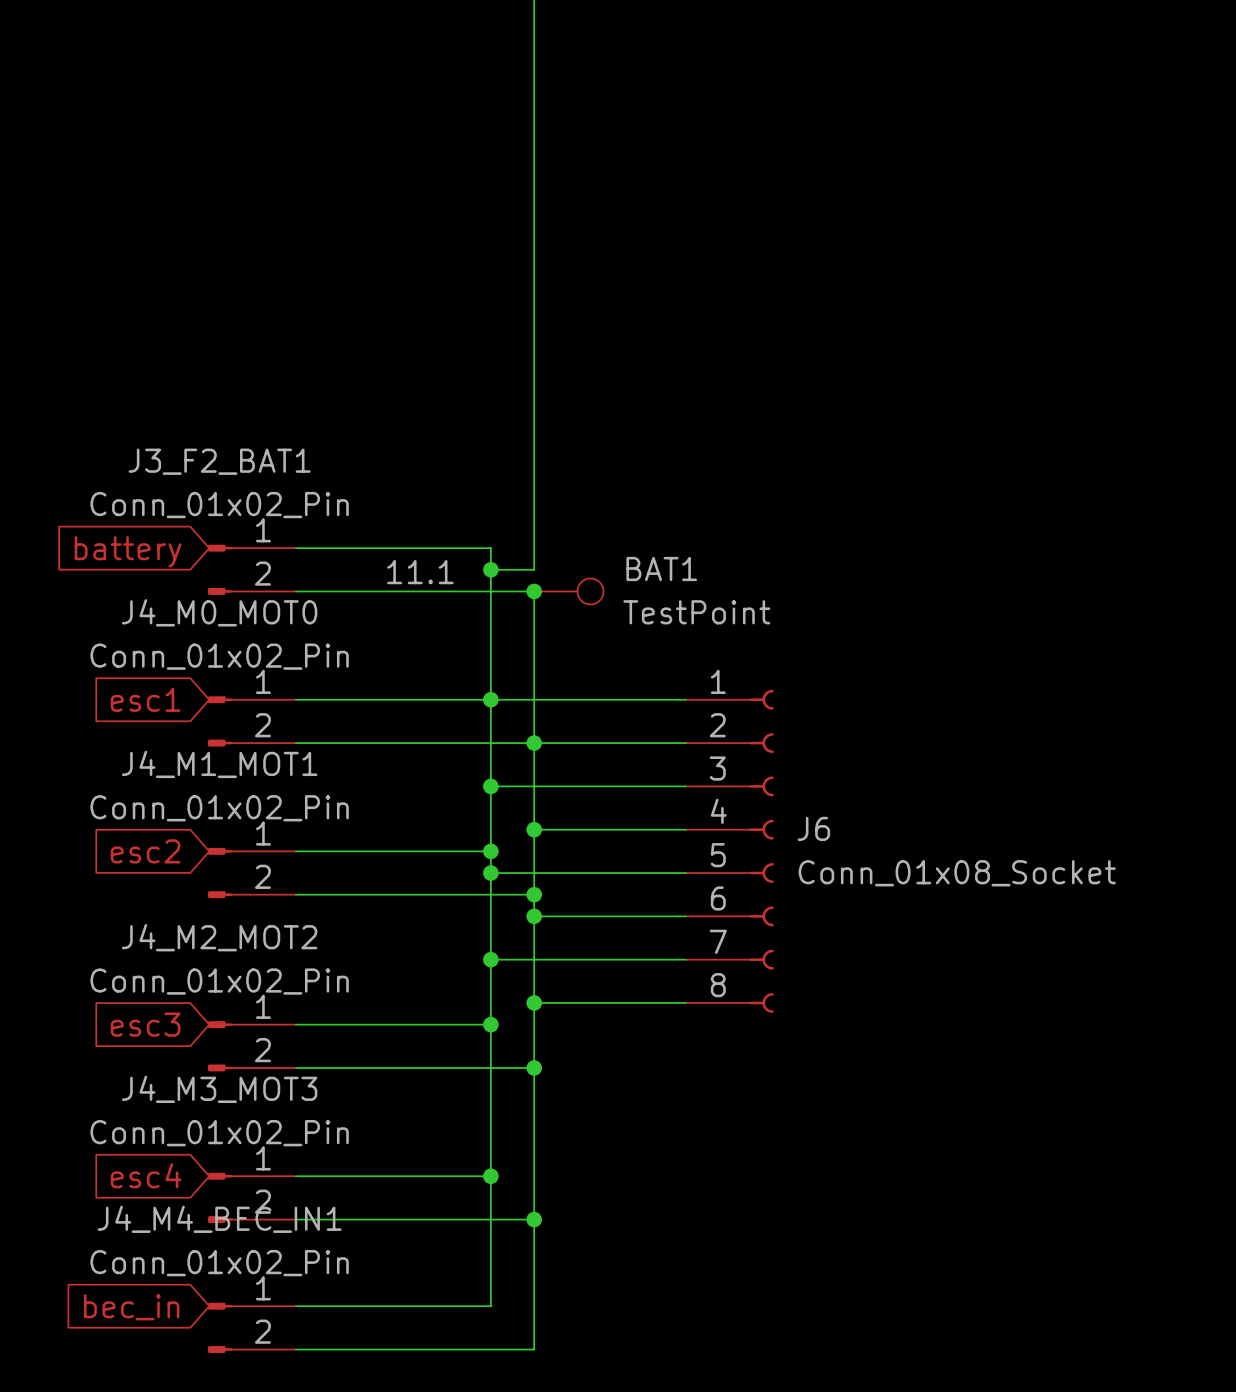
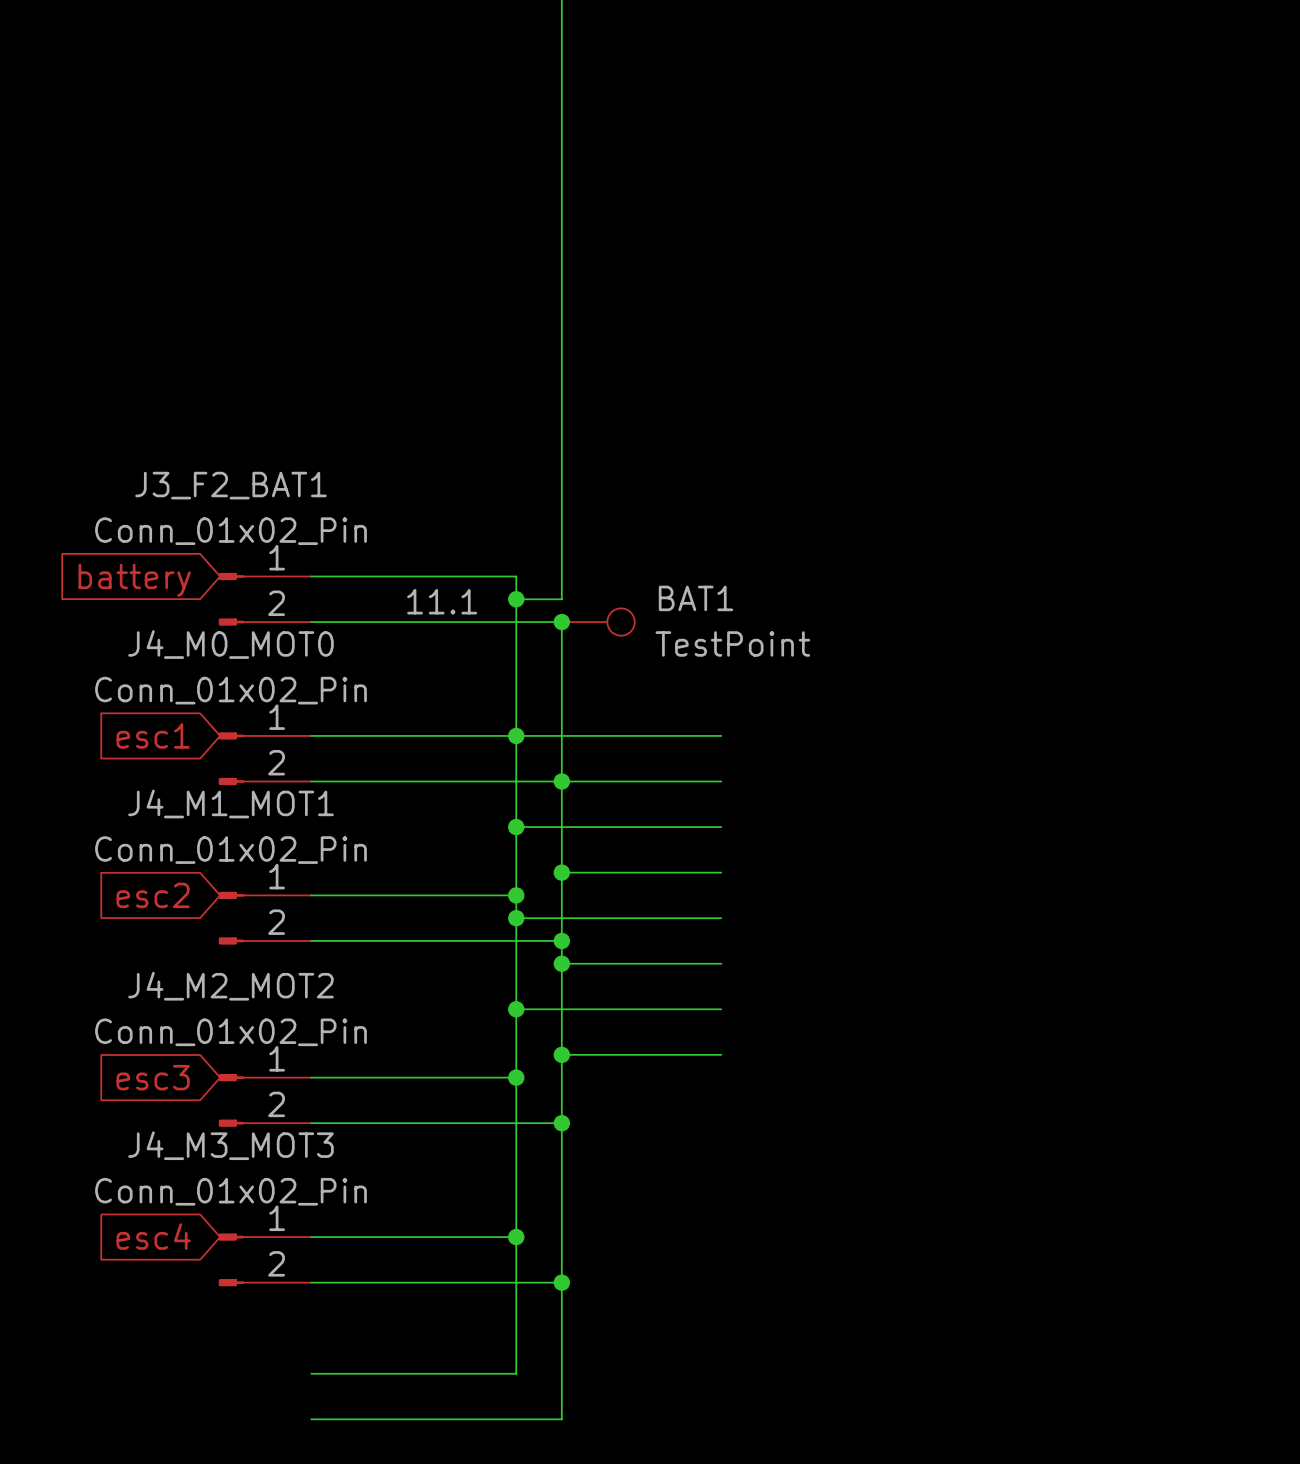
J6: Conn_01x08_Socket (729, 851) -> none
global label: bec_in (131, 1307) -> none
J4_M4_BEC_IN1: Conn_01x02_Pin (251, 1327) -> none

